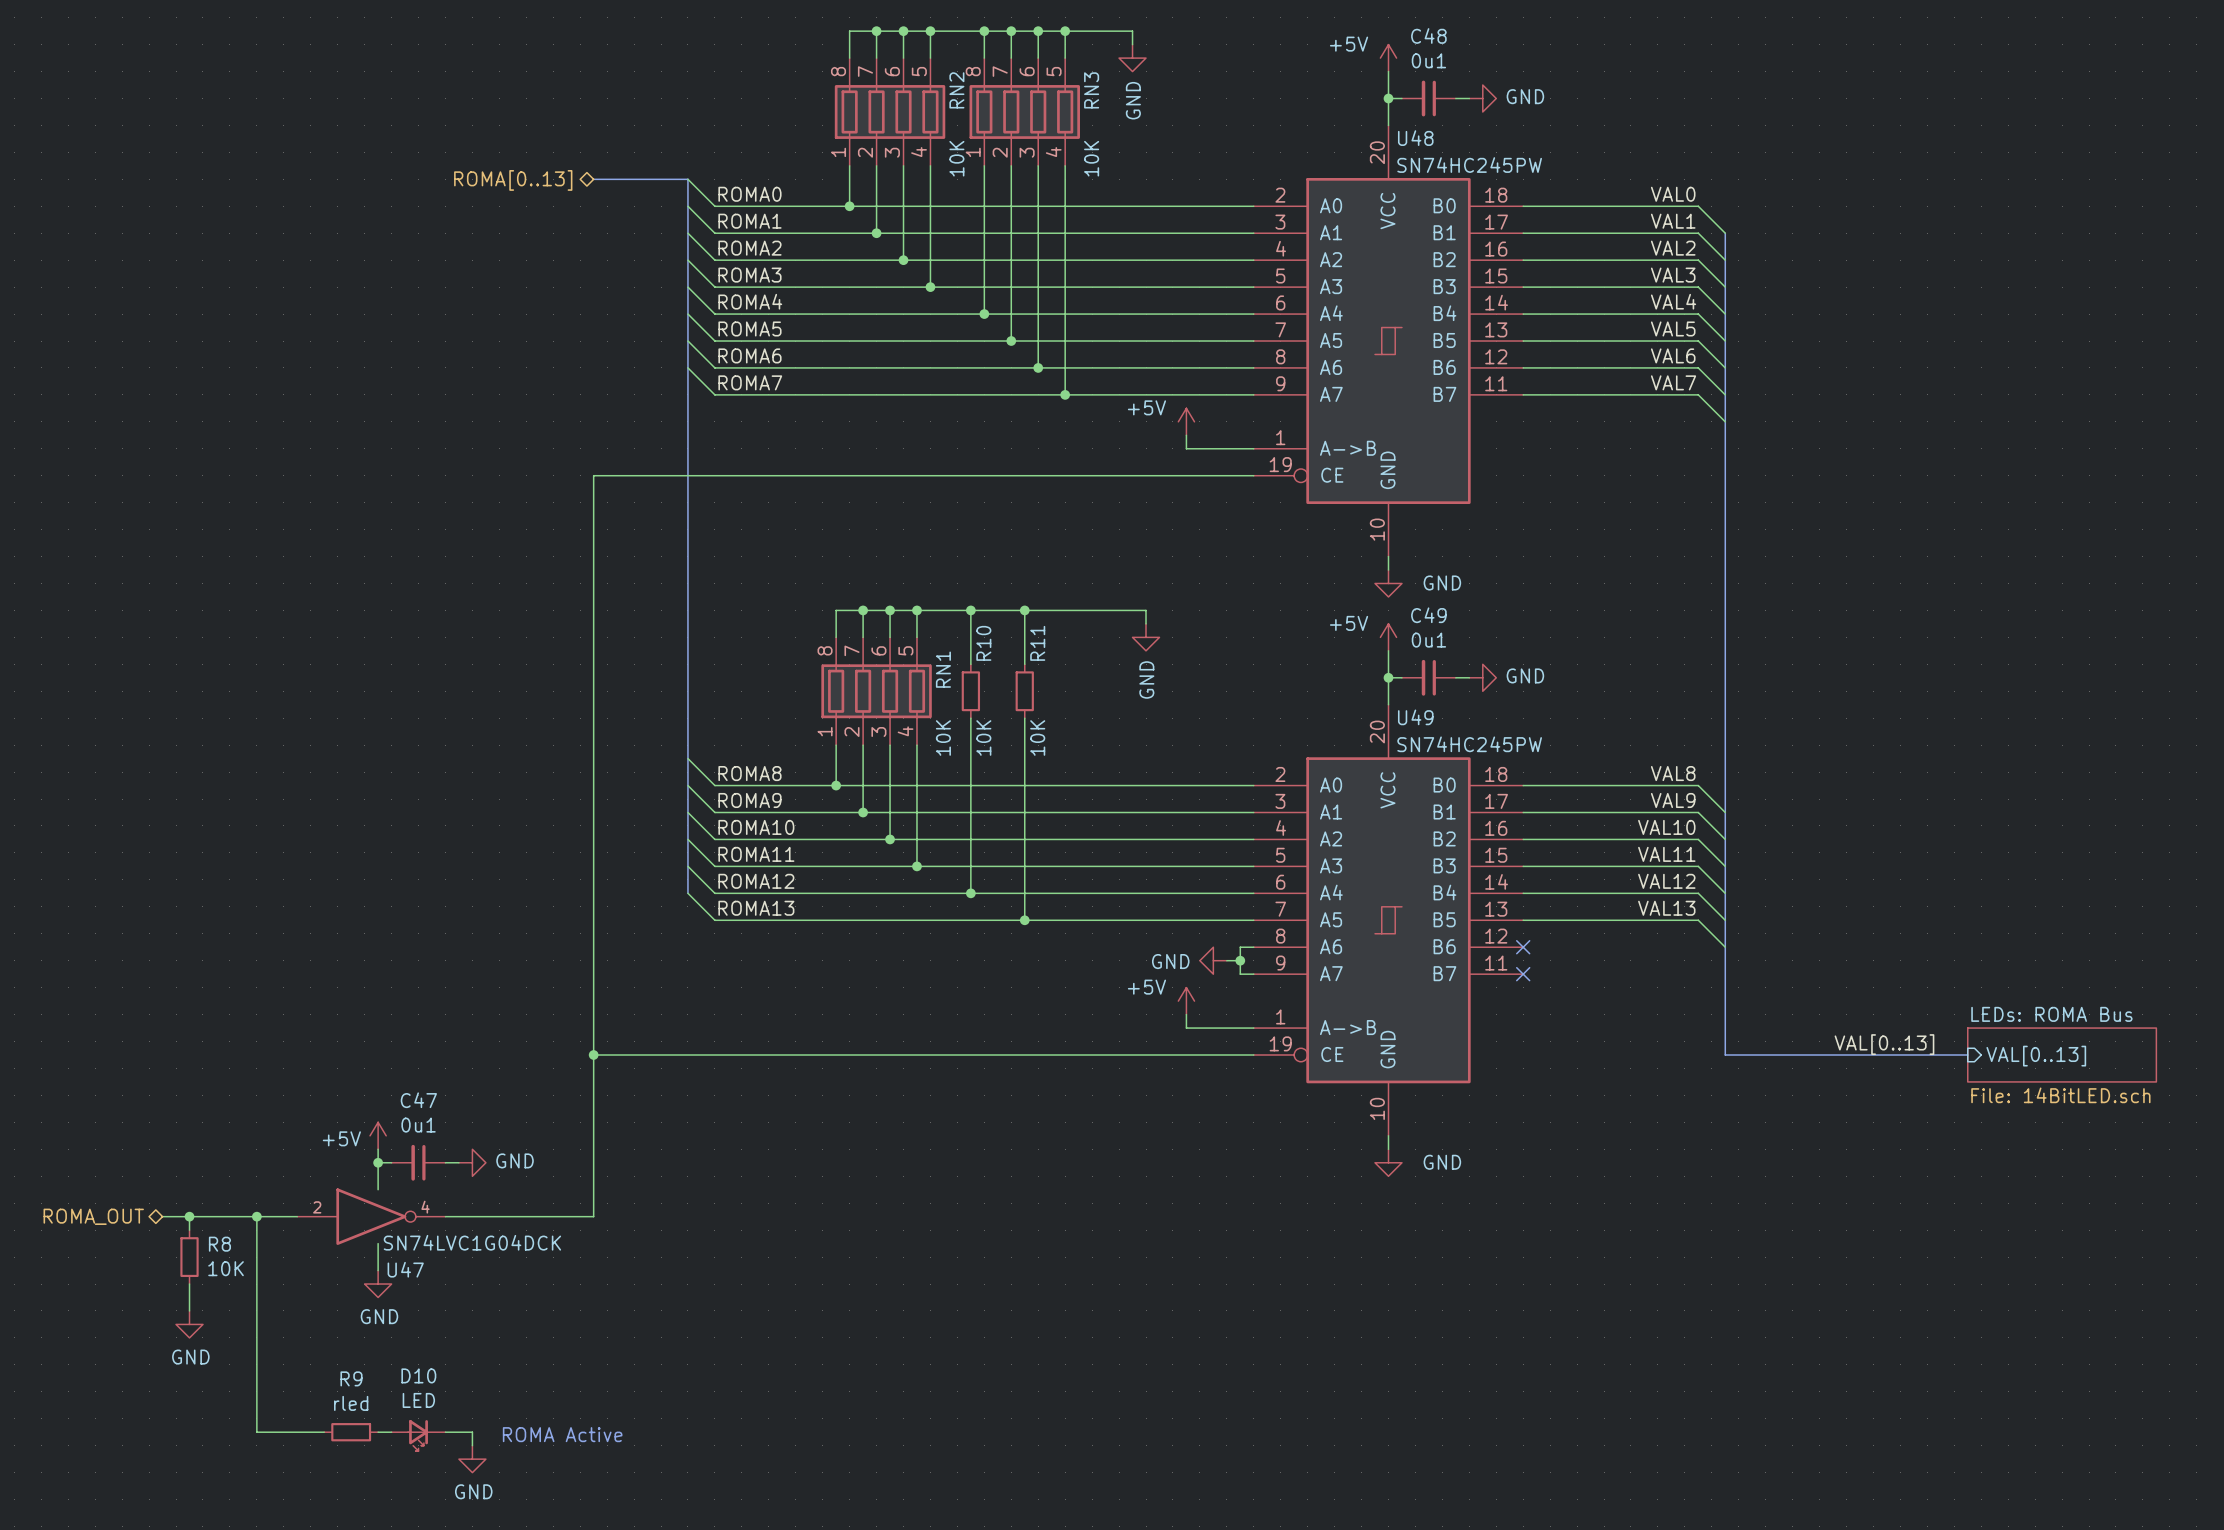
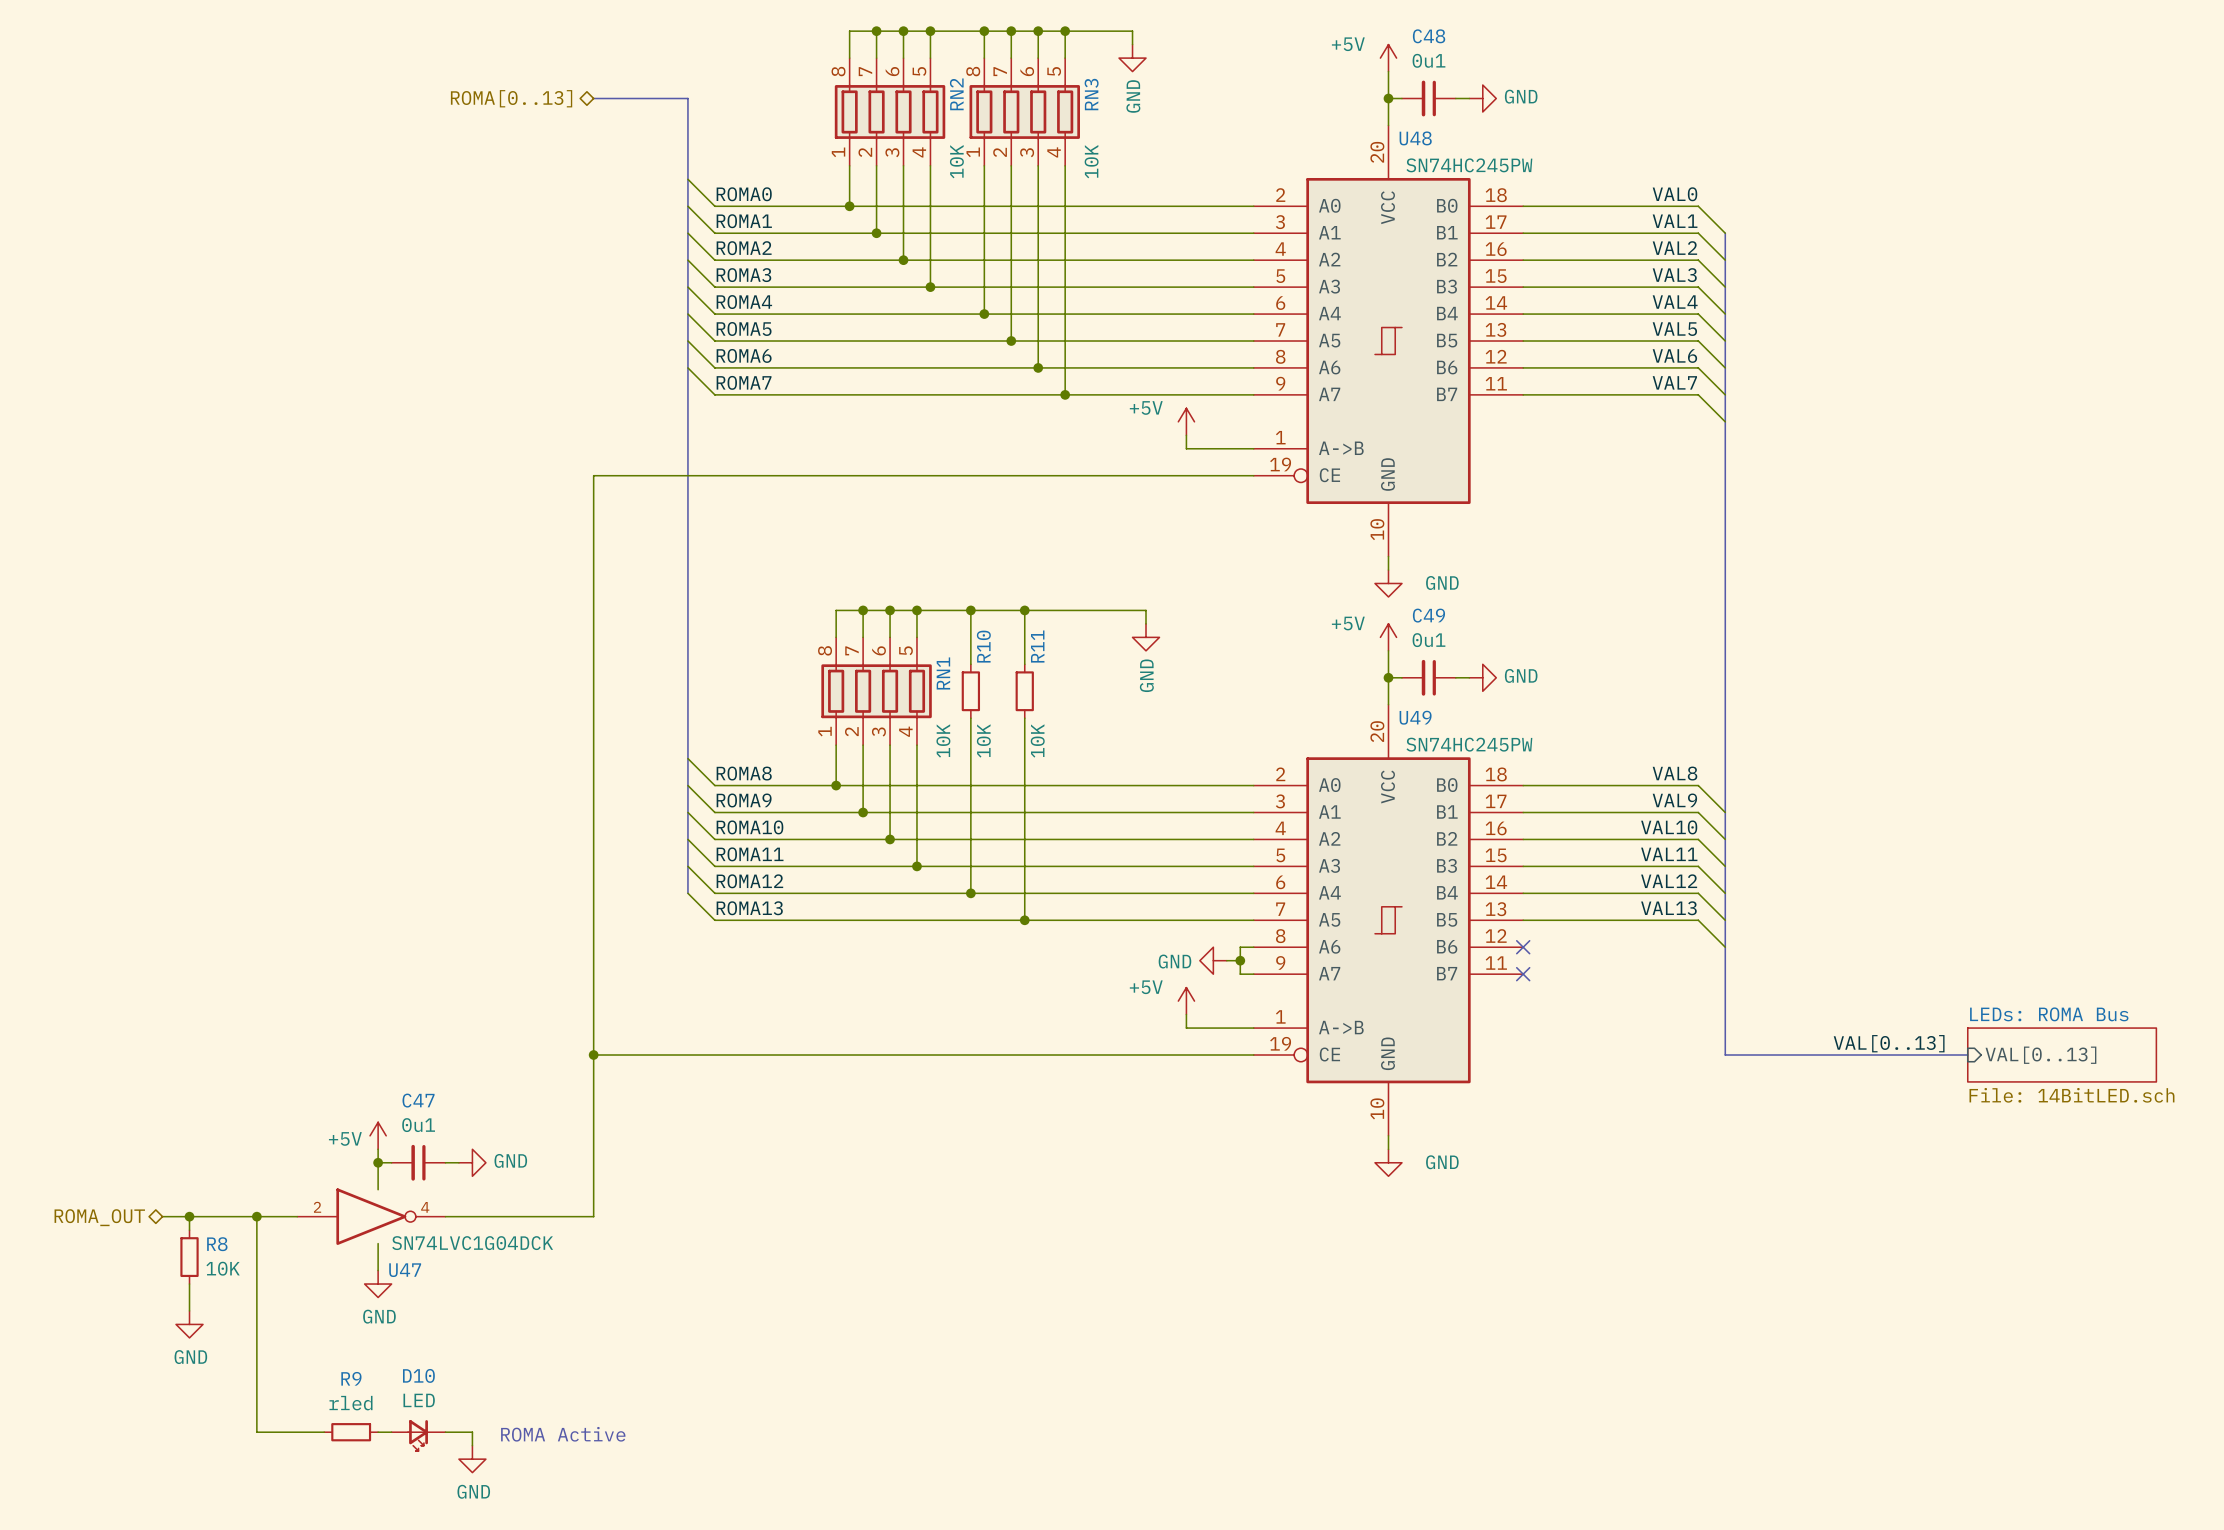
bus: (593, 179) (687, 179) -> (593, 98) (687, 98) (687, 179)
hierarchical label position: ROMA[0..13] (513, 180) -> ROMA[0..13] (511, 98)

